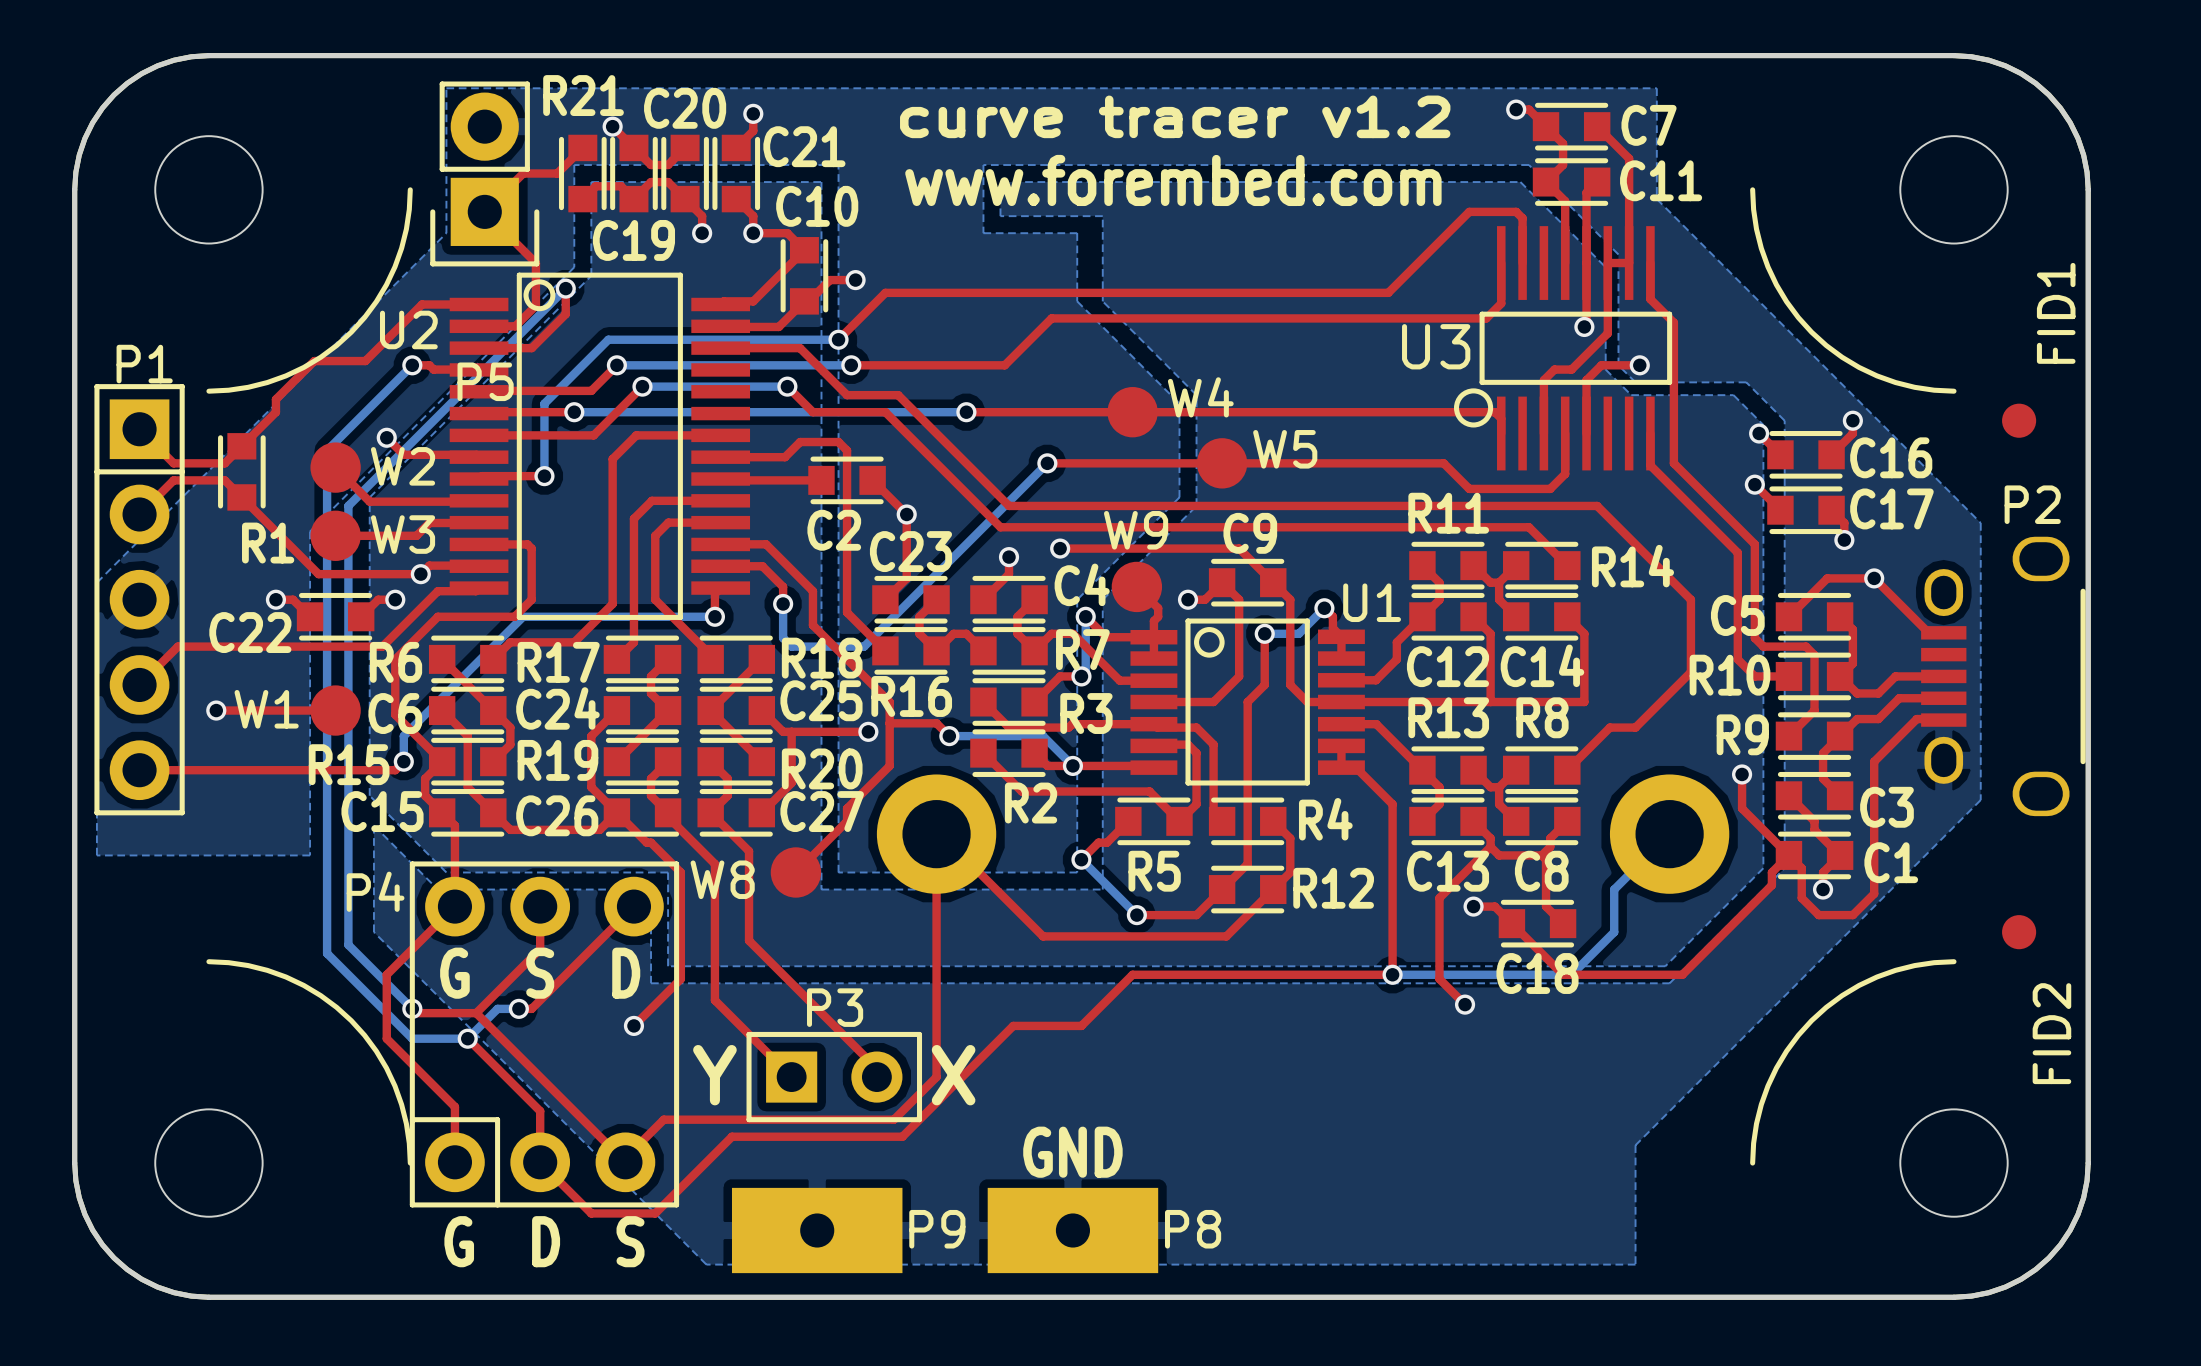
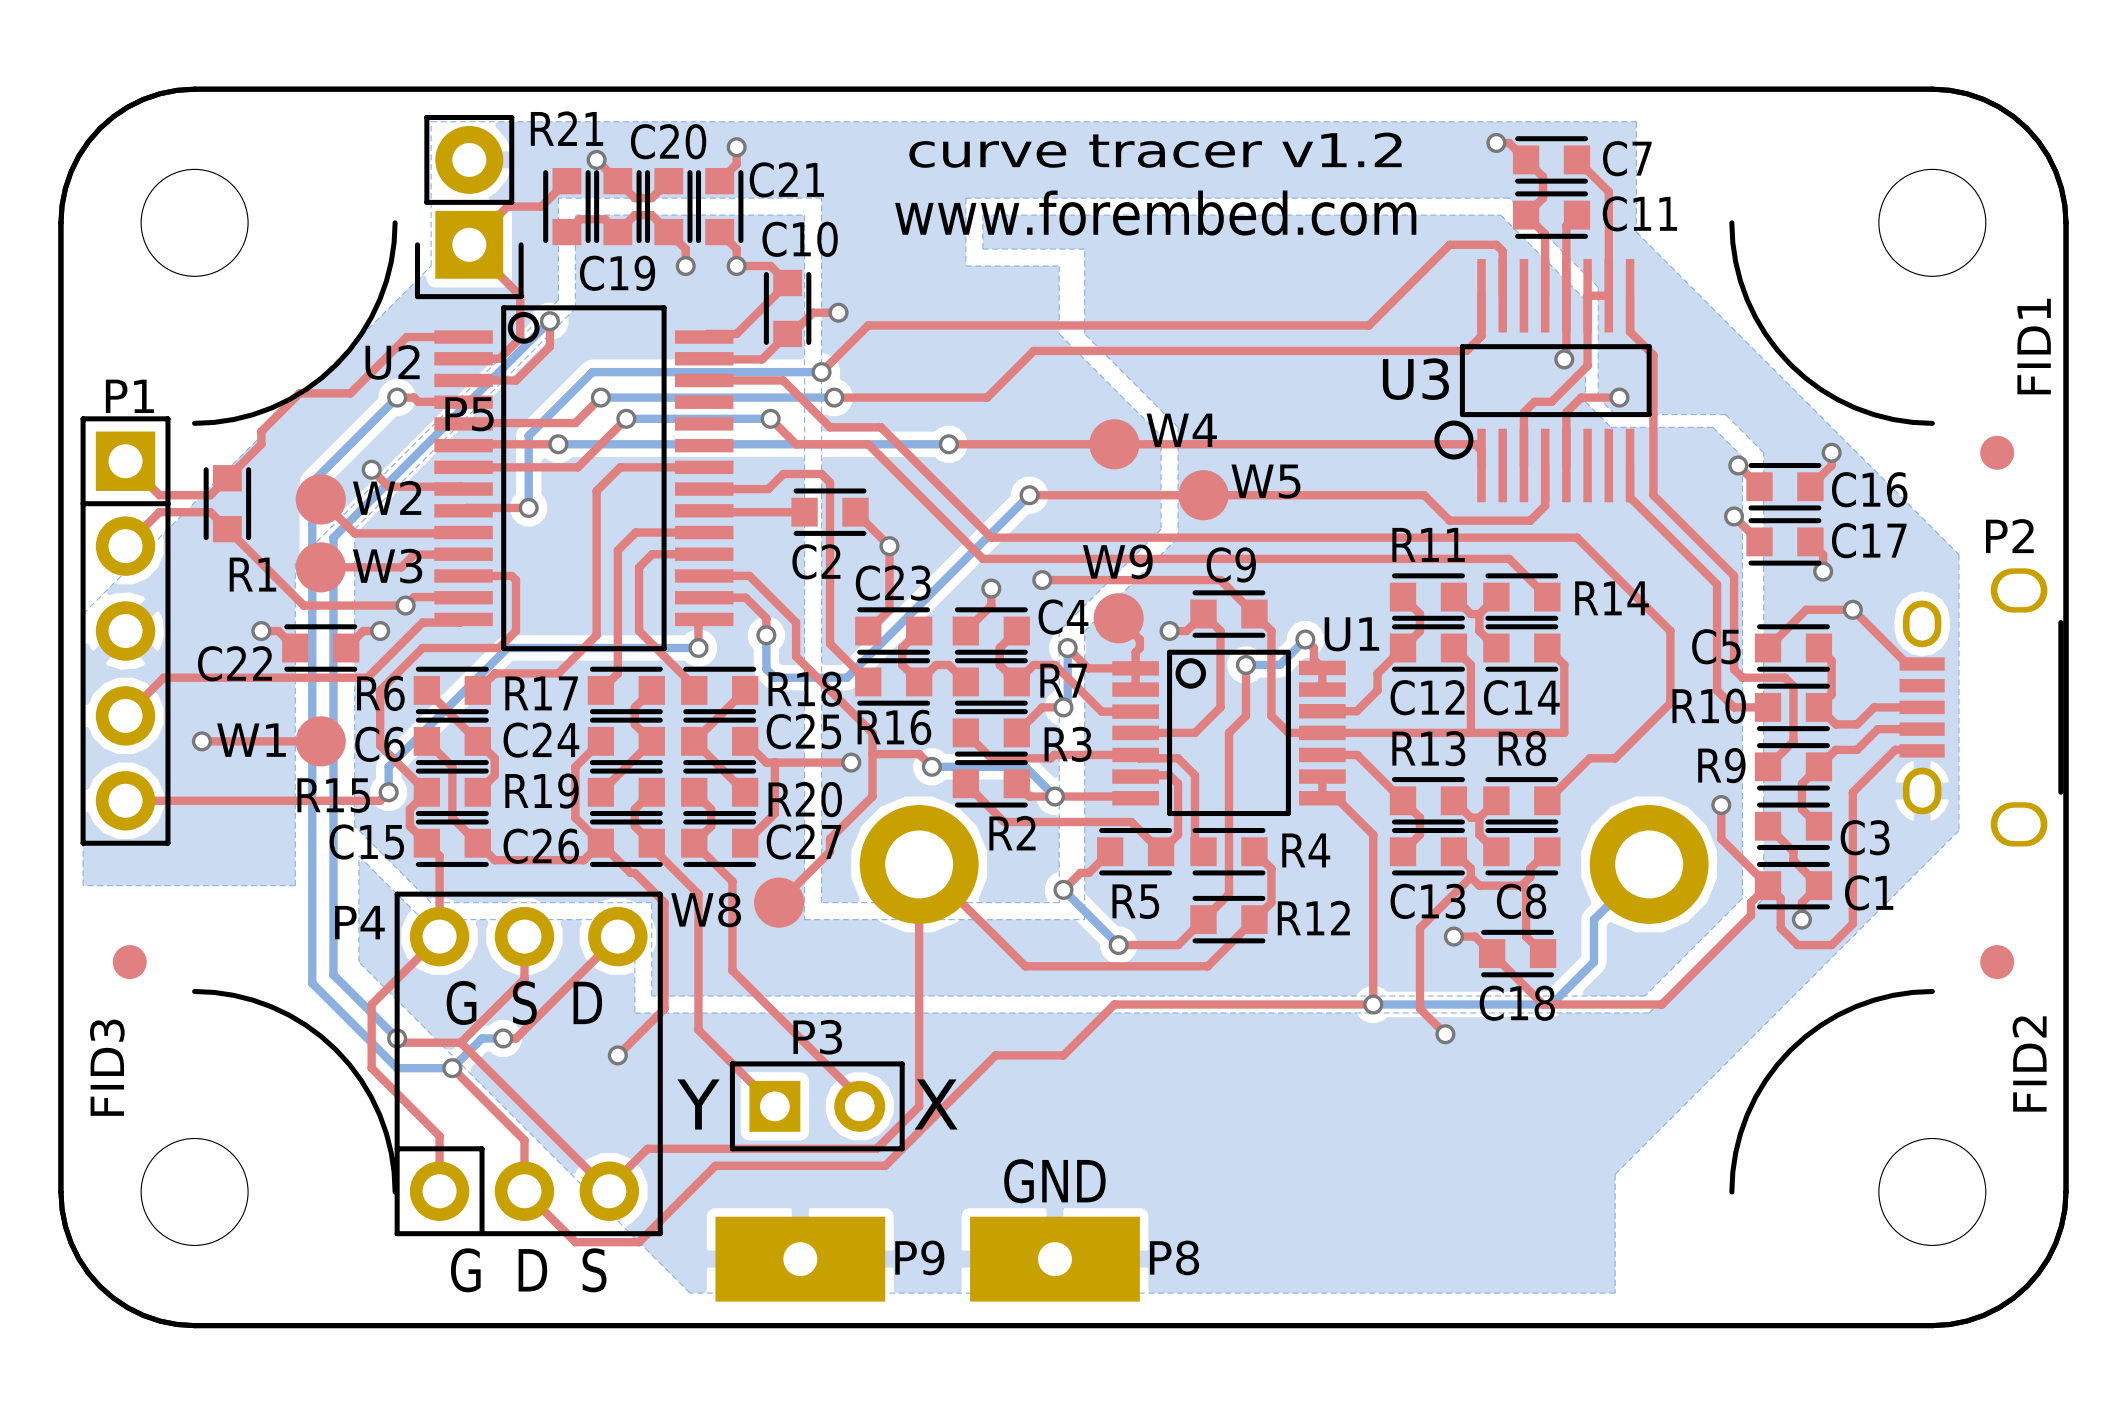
FID3: none -> (129, 962)

